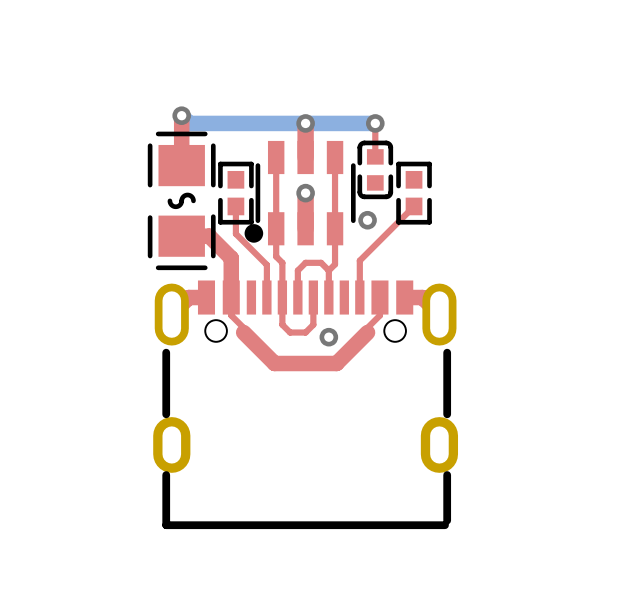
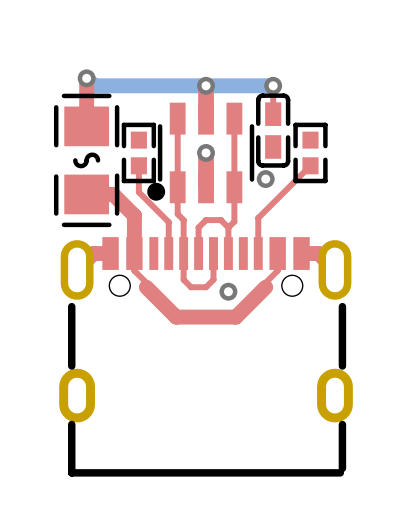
part footprint: [357, 140, 394, 200] -> [256, 93, 291, 168]

